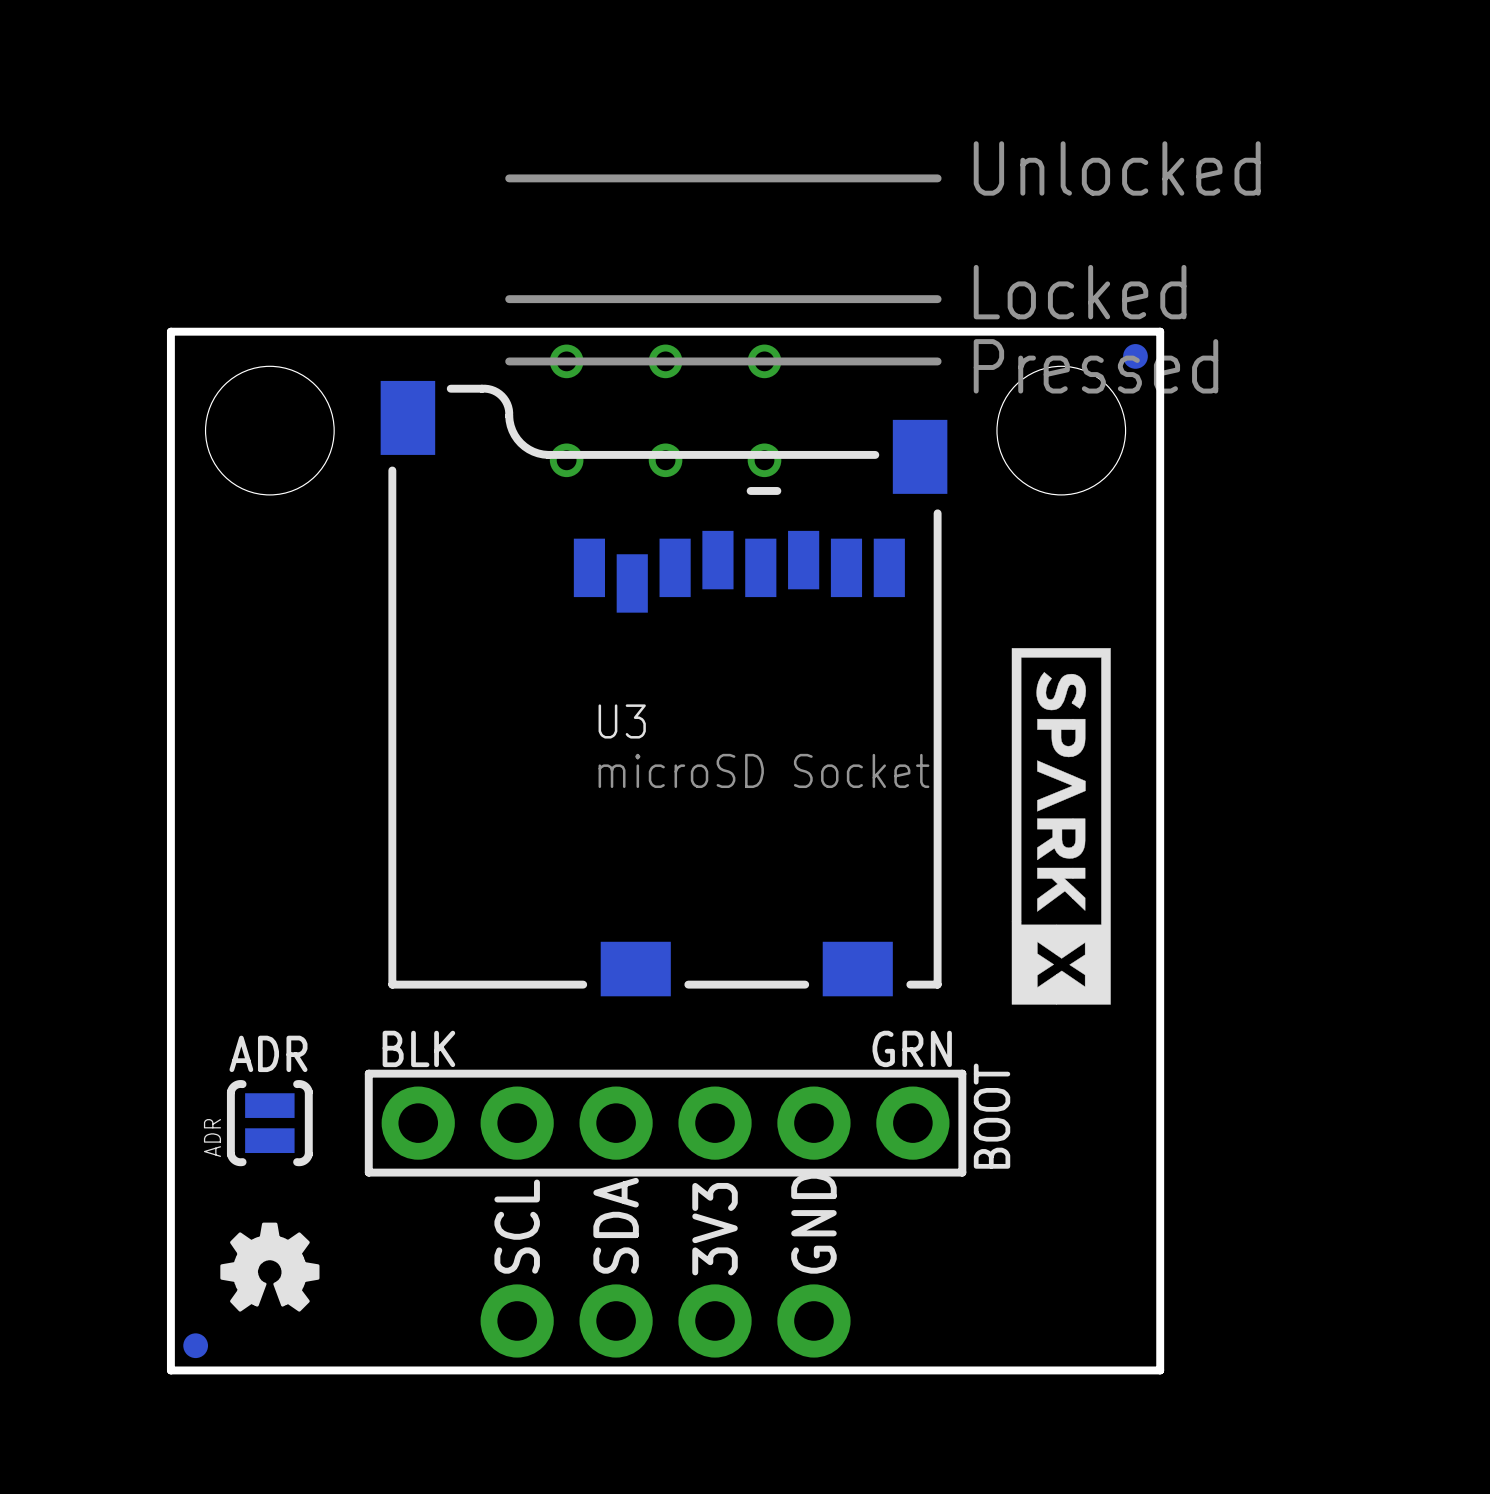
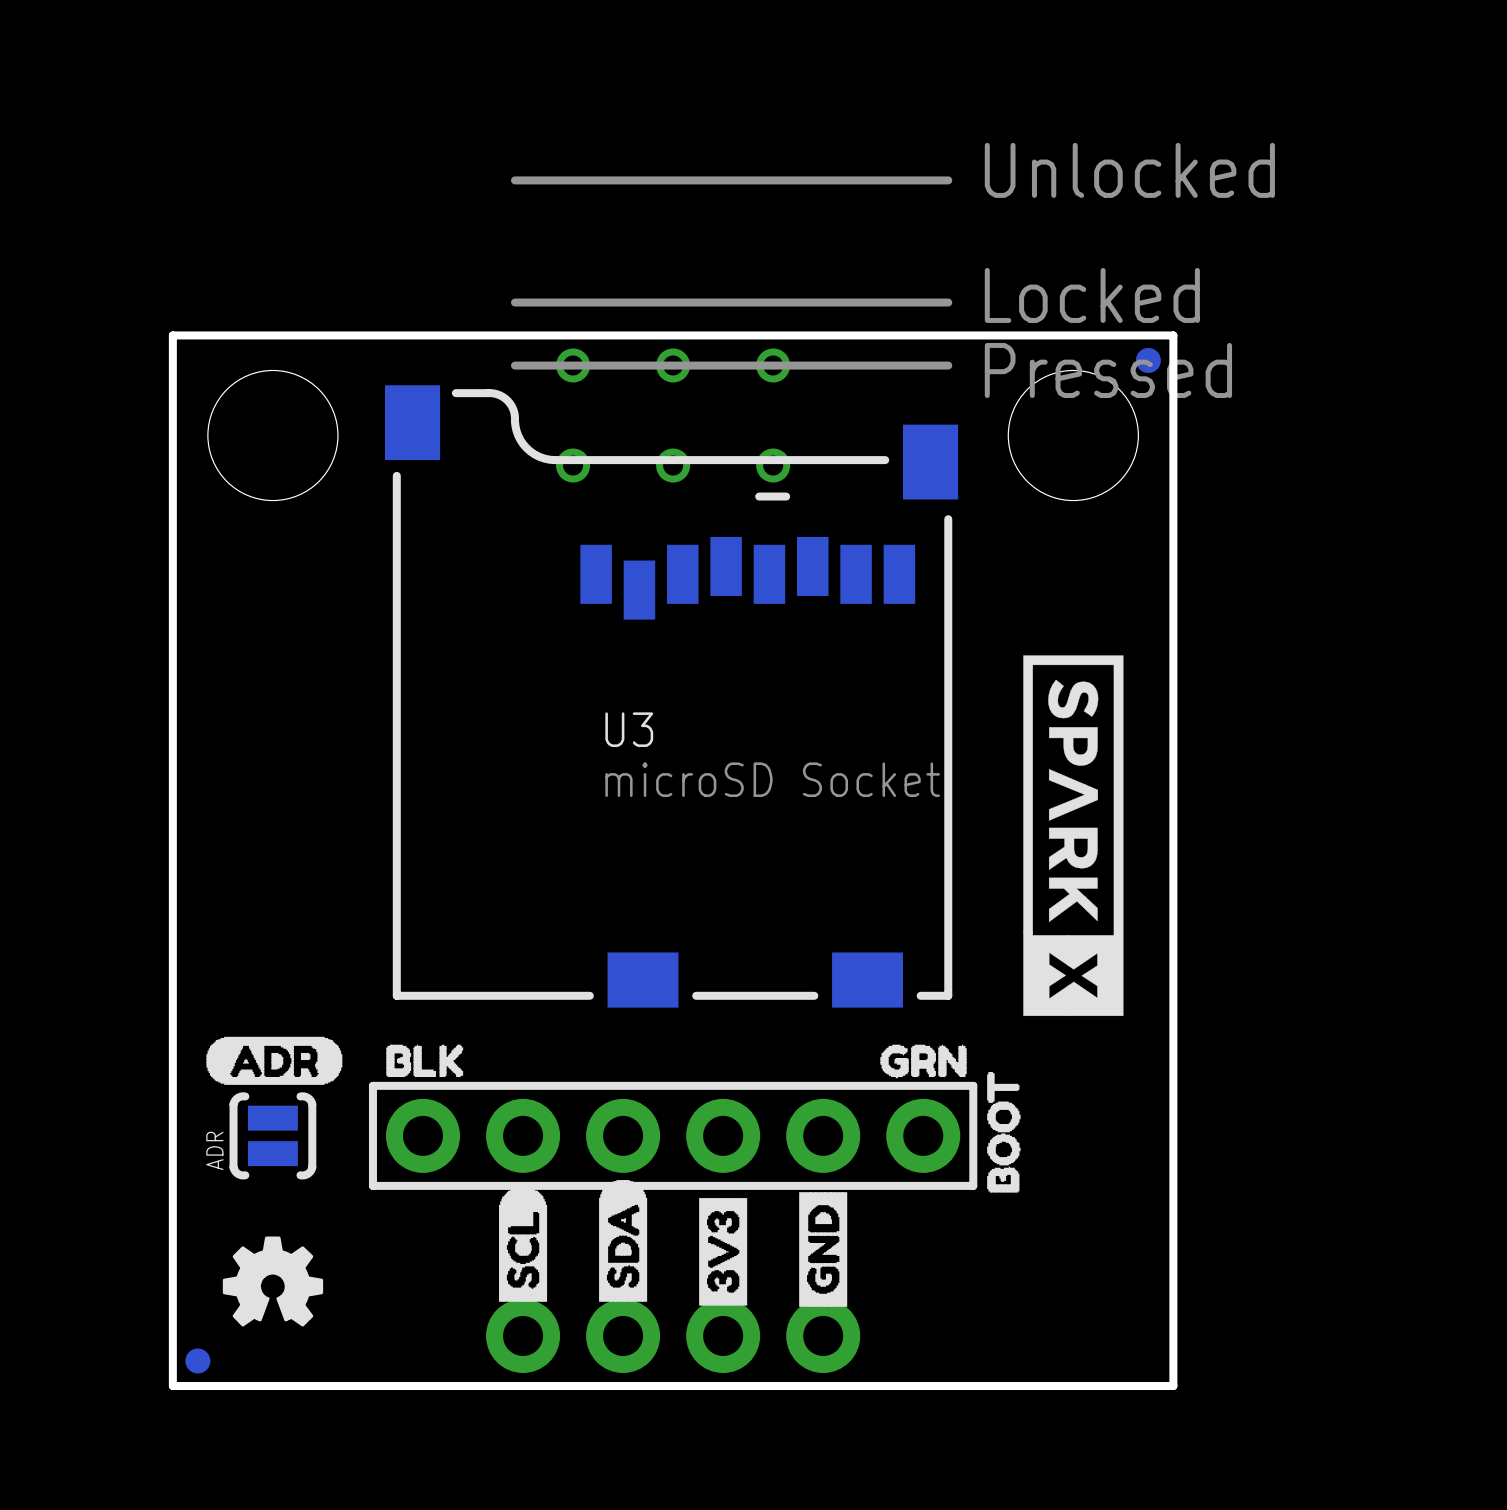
drawing: none -> [206, 1036, 464, 1085]
drawing: none -> [880, 1044, 1021, 1193]
text: BLK (418, 1048) -> none
text: GRN (912, 1048) -> none
text: ADR (268, 1053) -> none
text: BOOT (992, 1116) -> none
drawing: none -> [599, 1180, 648, 1302]
drawing: none -> [499, 1187, 548, 1302]
drawing: none -> [799, 1192, 848, 1307]
drawing: none -> [699, 1198, 748, 1306]
text: GND (813, 1223) -> none
text: SDA (616, 1225) -> none
text: SCL (517, 1226) -> none
text: 3V3 (715, 1229) -> none

